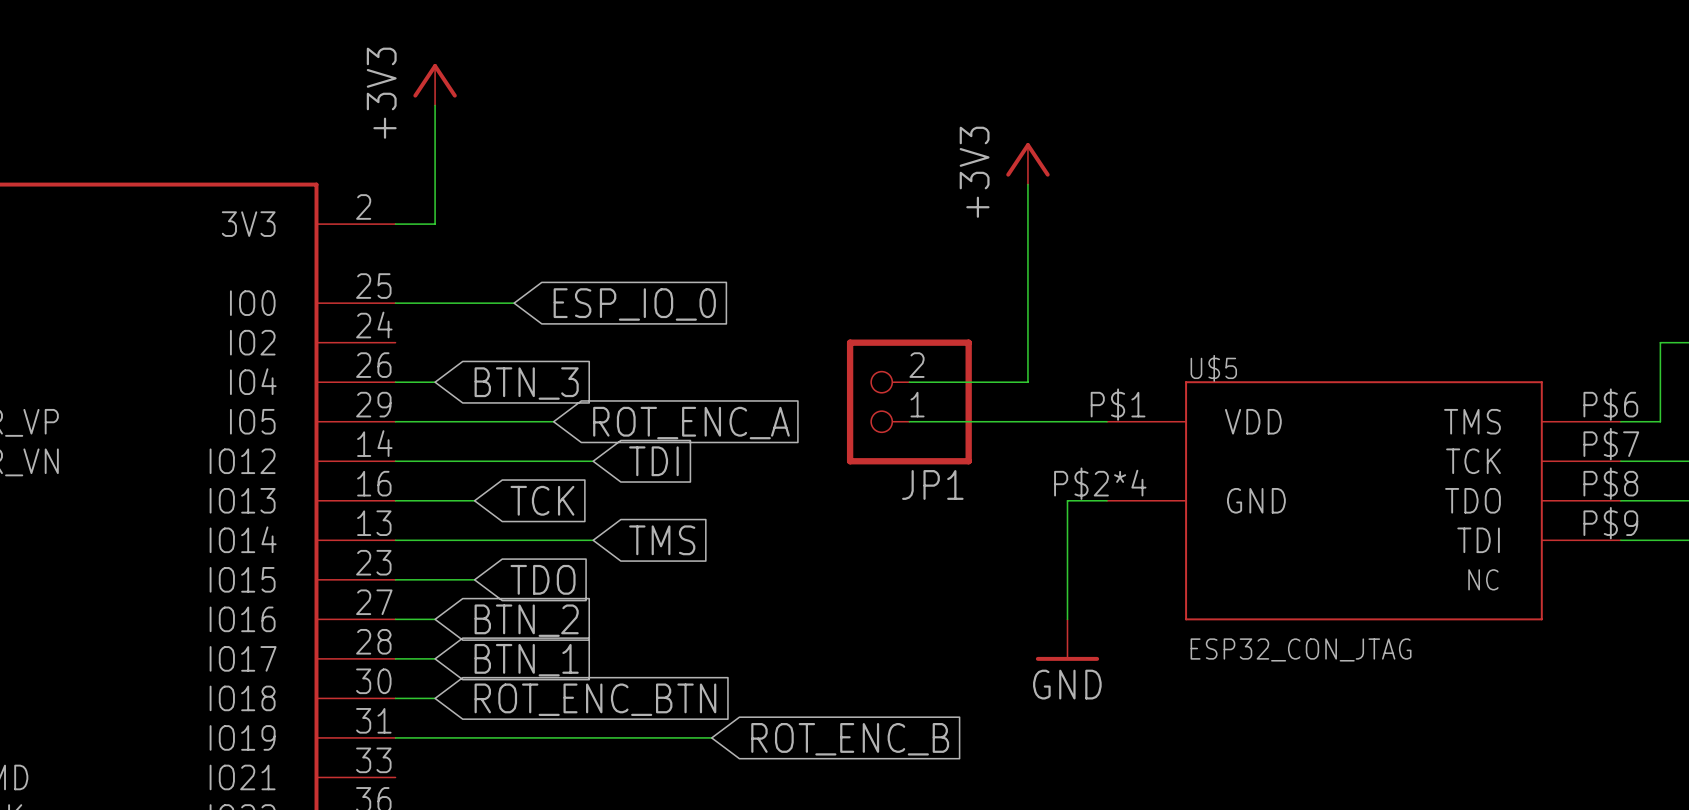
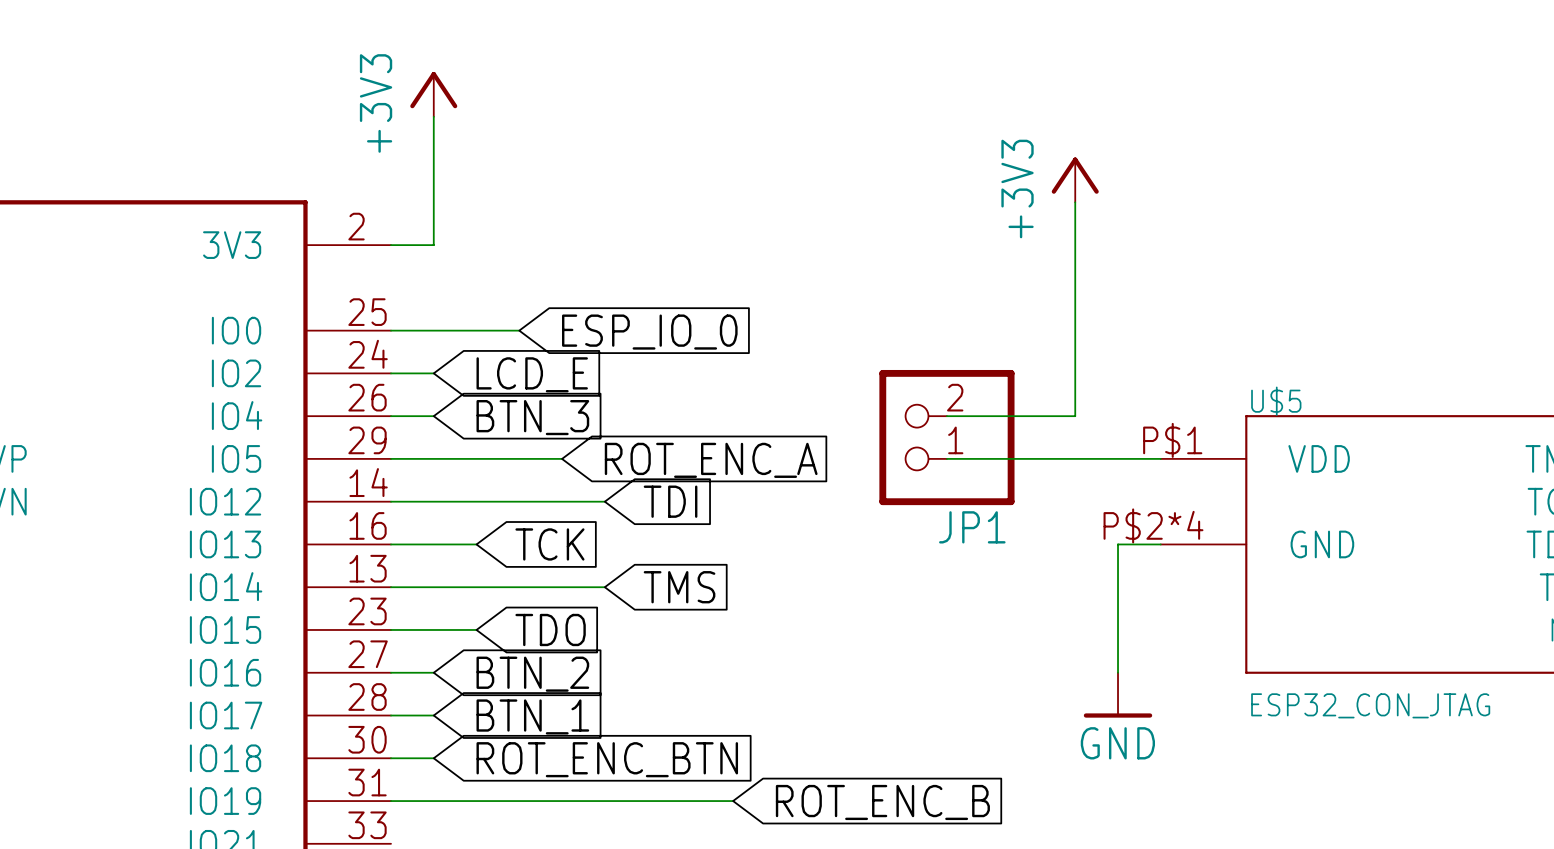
wire: none -> (391, 373) (433, 373)
global label: none -> LCD_E (532, 374)

